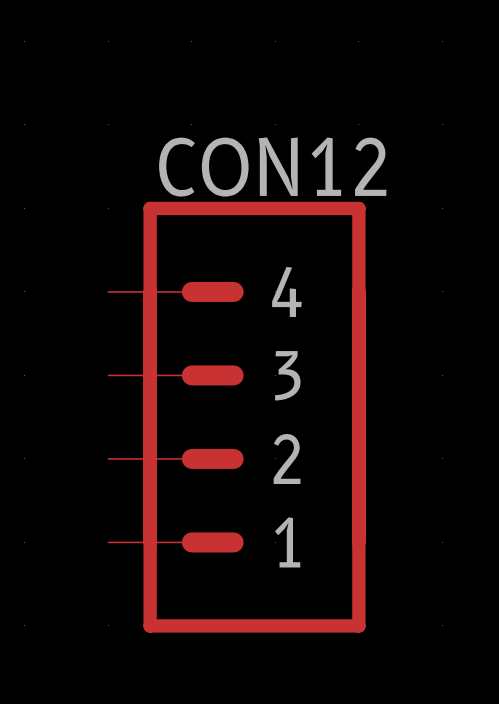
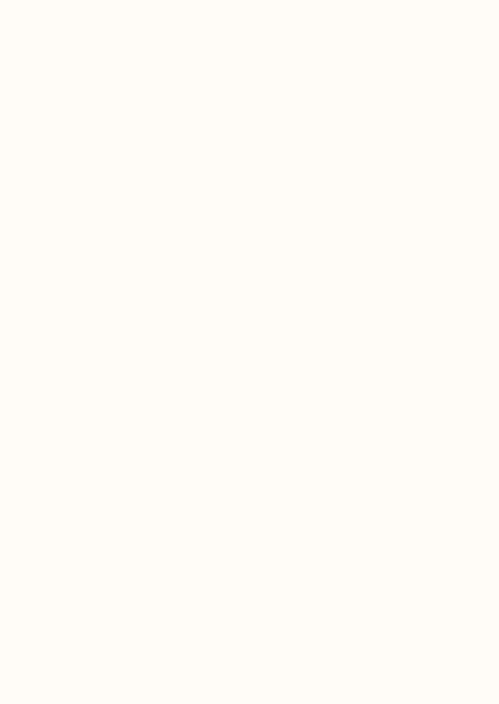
CON12: (236, 417) -> none

